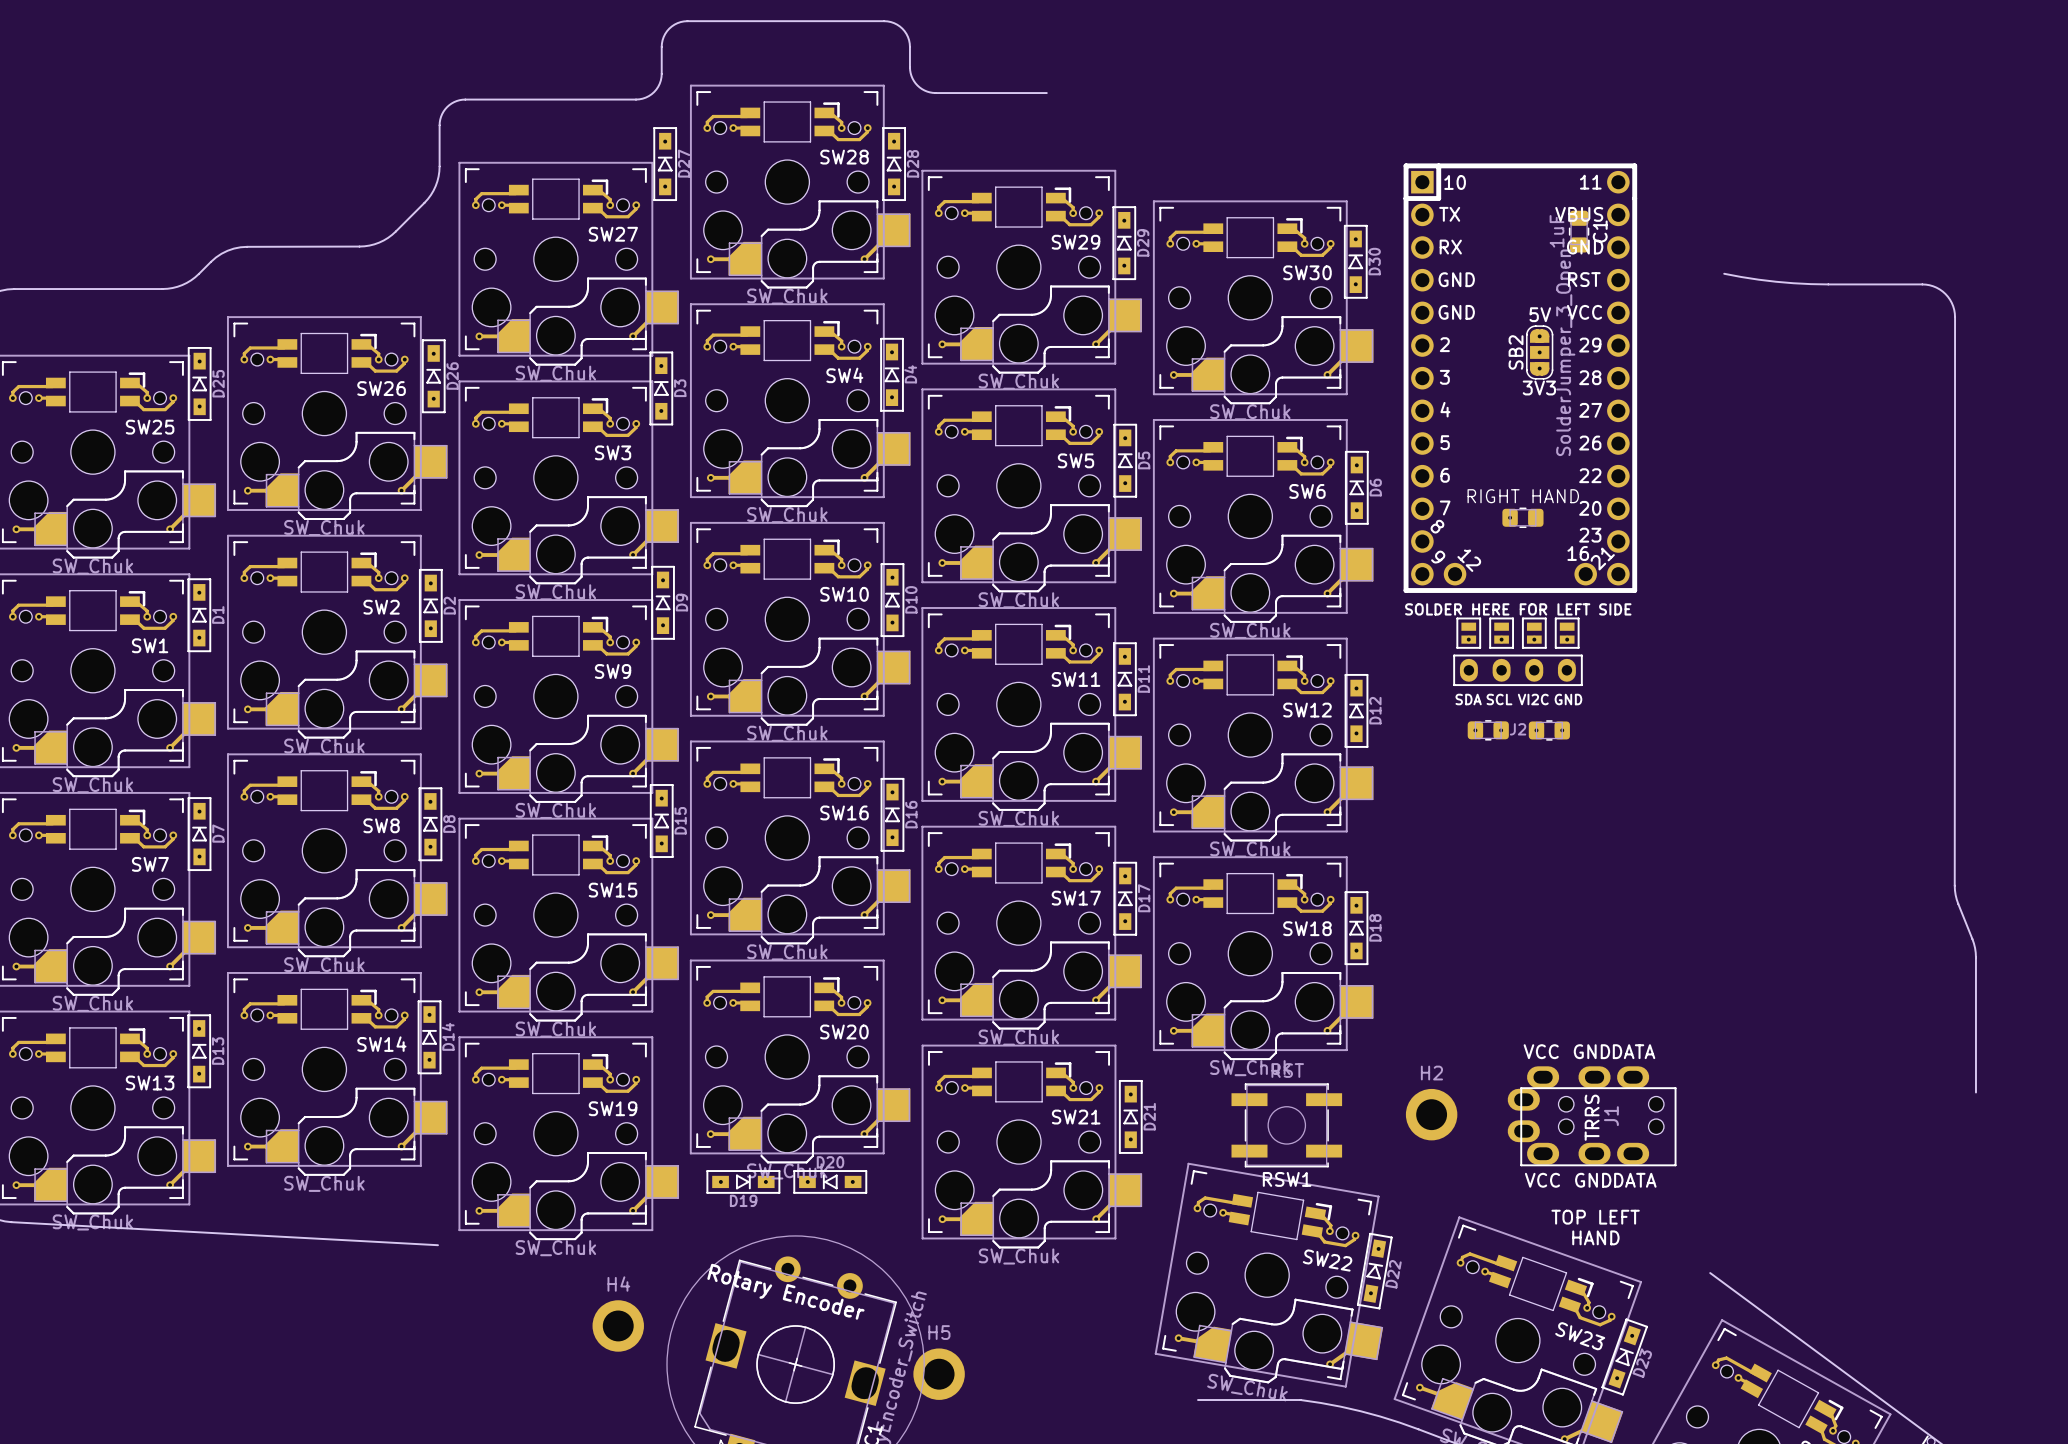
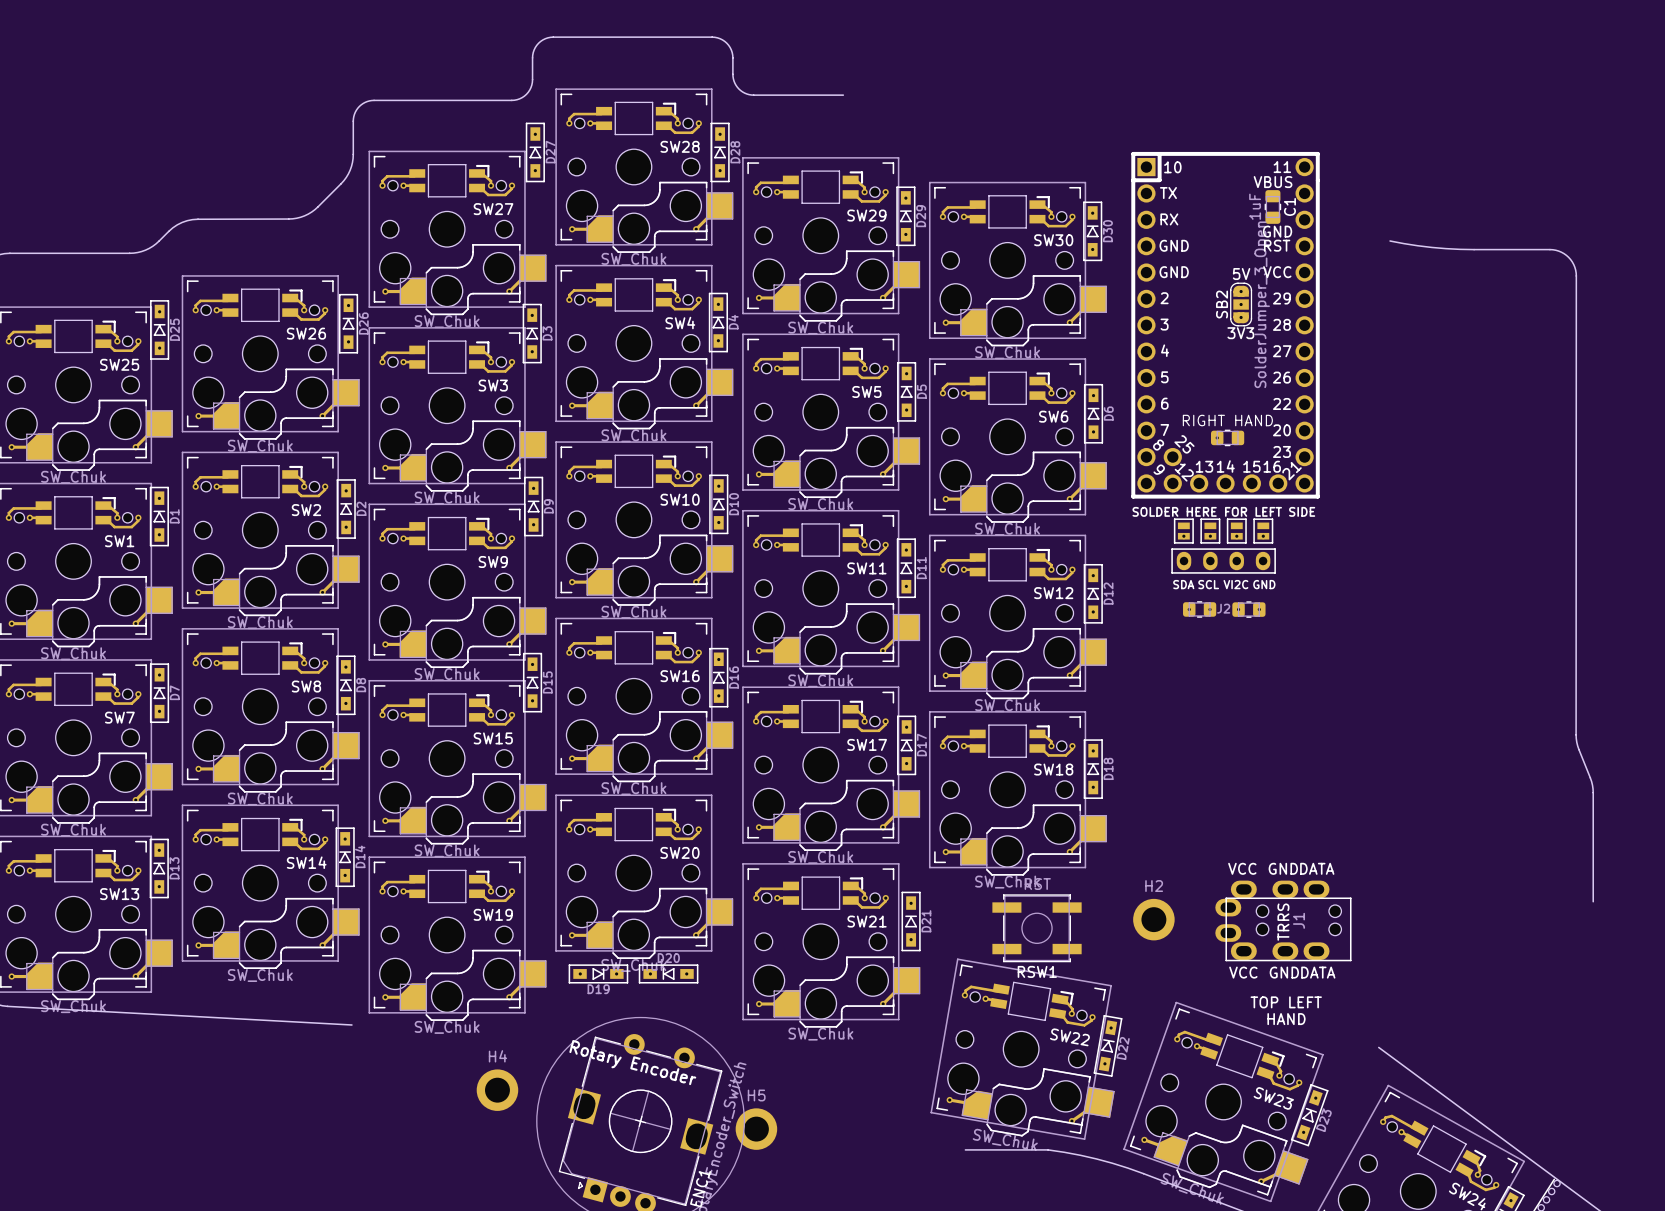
part footprint: [1403, 163, 1638, 593] -> [1131, 151, 1320, 499]

